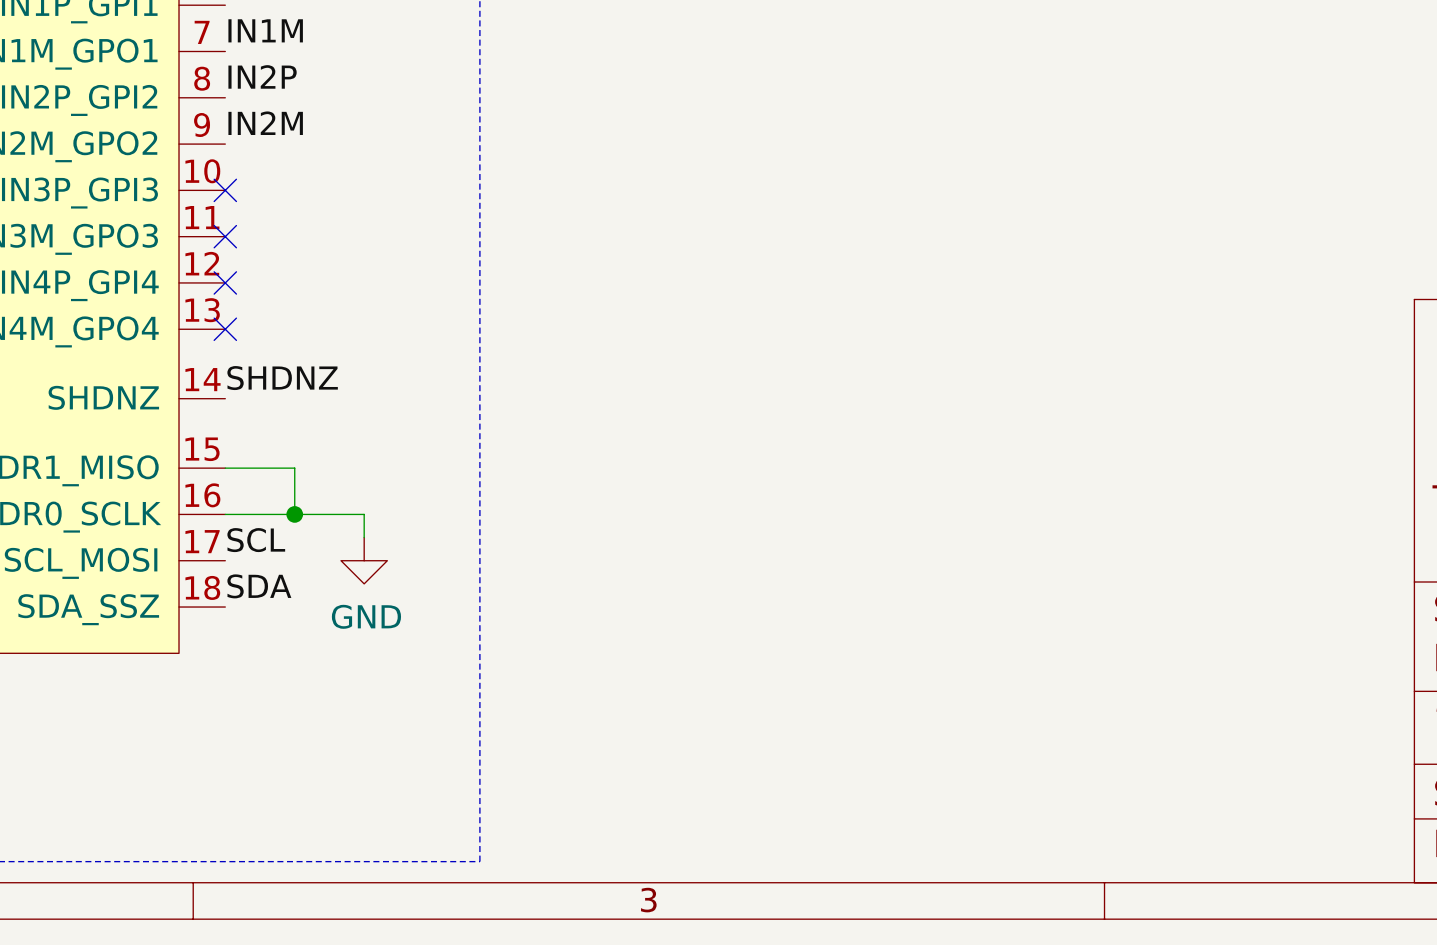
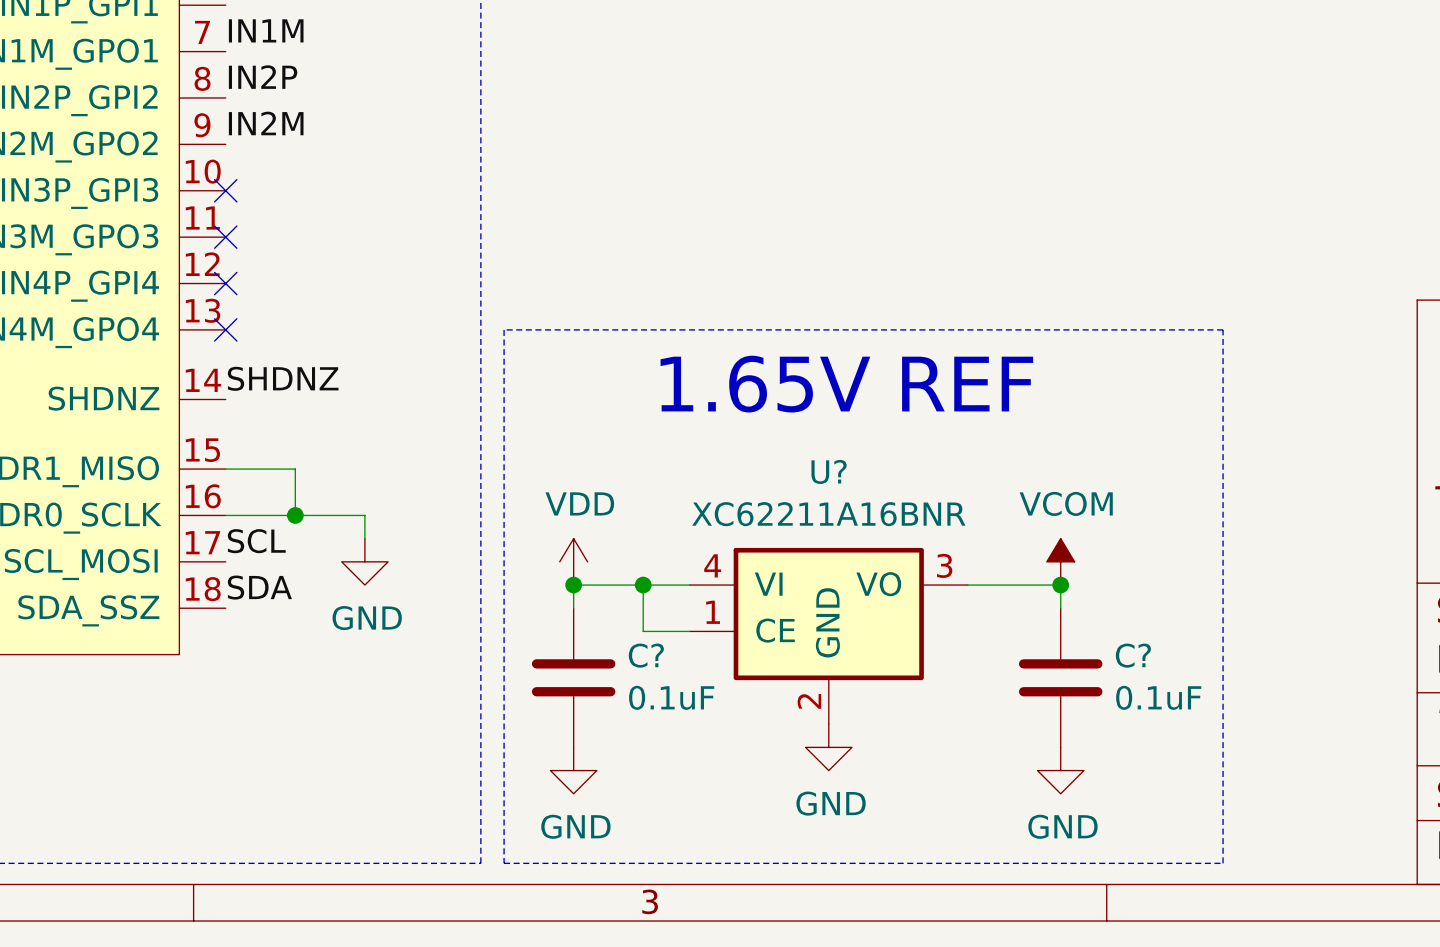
line: none -> (504, 329) (504, 863) (1223, 863) (1223, 329) (504, 329)
text: none -> 1.65V REF (846, 384)
power symbol: none -> VDD (573, 561)
power symbol: none -> VCOM (1060, 561)
junction: none -> (573, 585)
wire: none -> (643, 585) (643, 631) (689, 631)
junction: none -> (643, 585)
wire: none -> (689, 585) (573, 585) (573, 608)
wire: none -> (967, 585) (1060, 585) (1060, 608)
junction: none -> (1060, 585)
U?: none -> XC62211A16BNR (828, 636)
C?: none -> 0.1uF (573, 677)
C?: none -> 0.1uF (1060, 677)
power symbol: none -> GND (828, 747)
power symbol: none -> GND (573, 770)
power symbol: none -> GND (1060, 770)

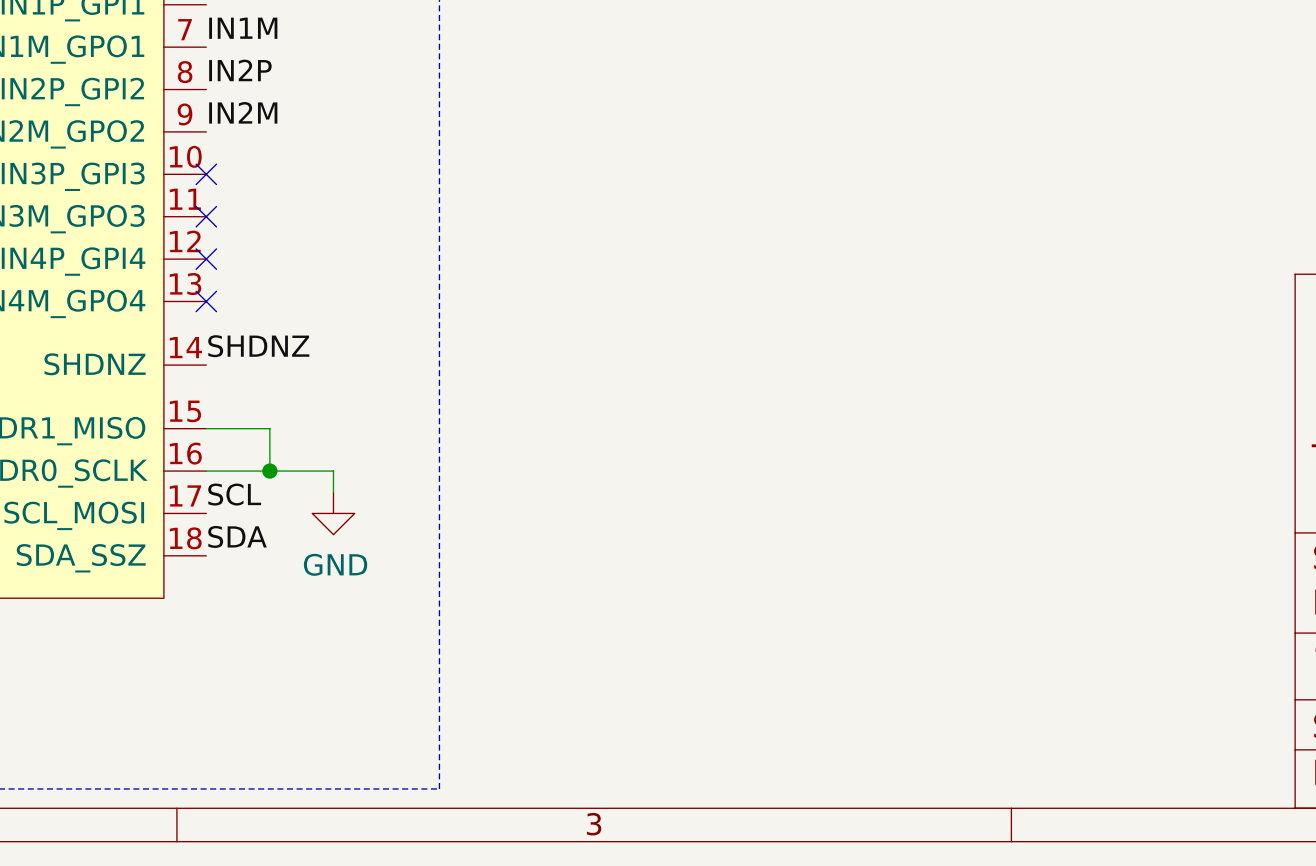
line: (504, 329) (504, 863) (1223, 863) (1223, 329) (504, 329) -> none
text: 1.65V REF (846, 384) -> none
power symbol: VDD (573, 561) -> none
power symbol: VCOM (1060, 561) -> none
junction: (573, 585) -> none
wire: (643, 585) (643, 631) (689, 631) -> none
junction: (643, 585) -> none
wire: (689, 585) (573, 585) (573, 608) -> none
wire: (967, 585) (1060, 585) (1060, 608) -> none
junction: (1060, 585) -> none
U?: XC62211A16BNR (828, 636) -> none
C?: 0.1uF (573, 677) -> none
C?: 0.1uF (1060, 677) -> none
power symbol: GND (828, 747) -> none
power symbol: GND (573, 770) -> none
power symbol: GND (1060, 770) -> none

